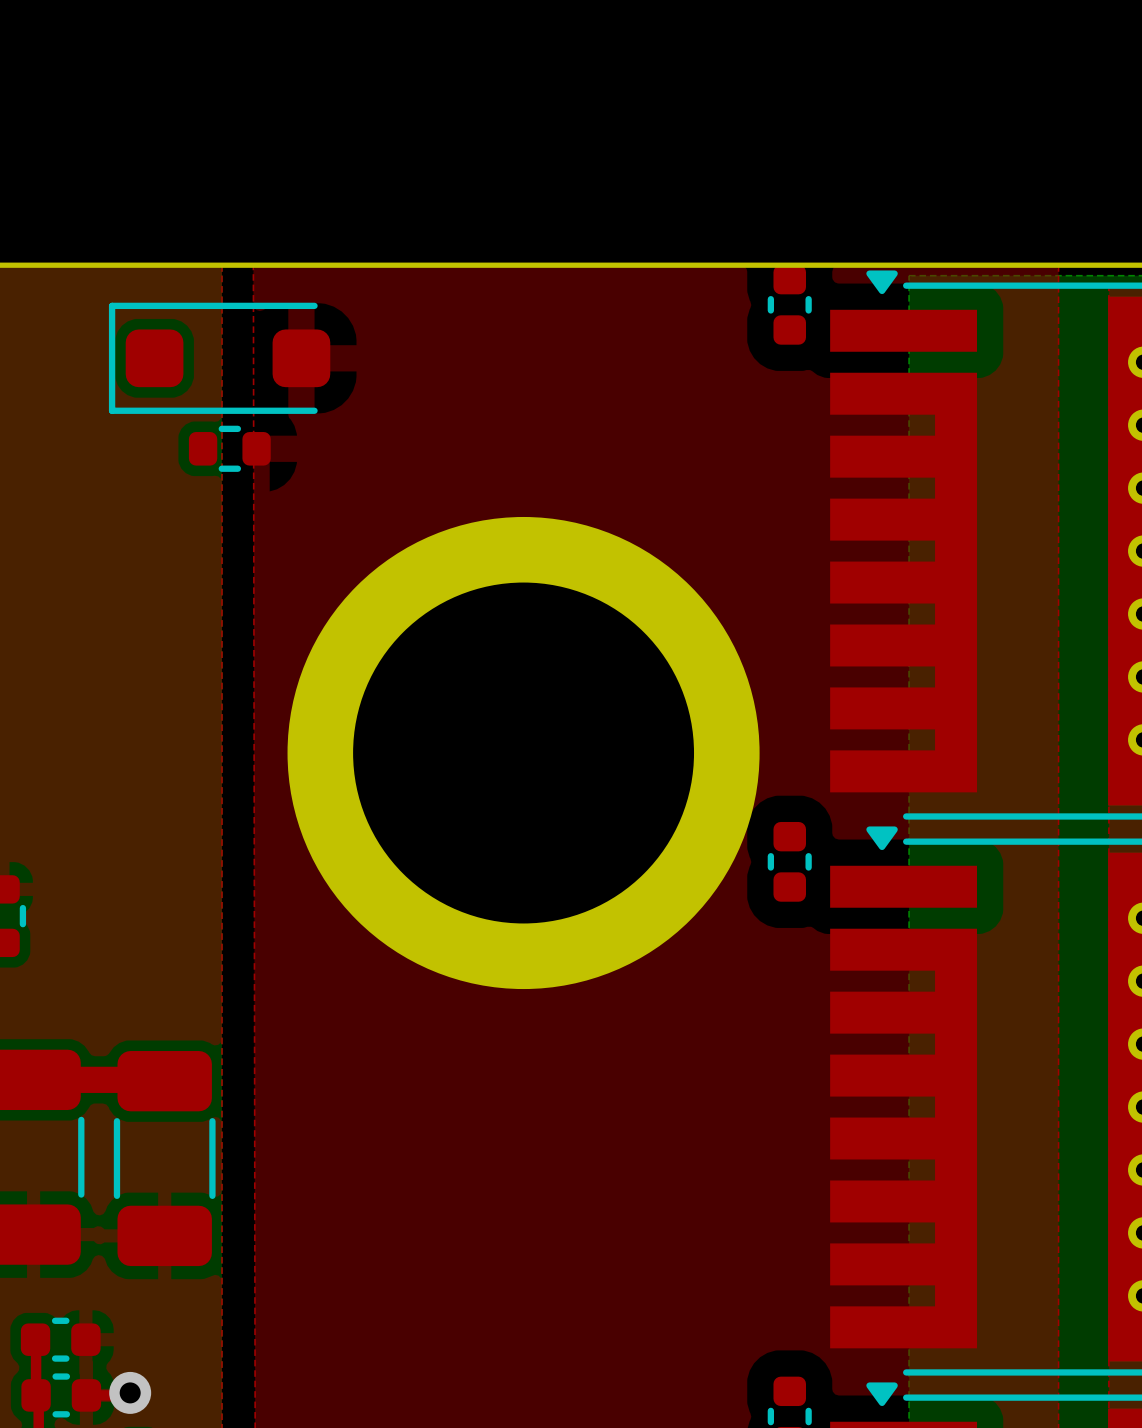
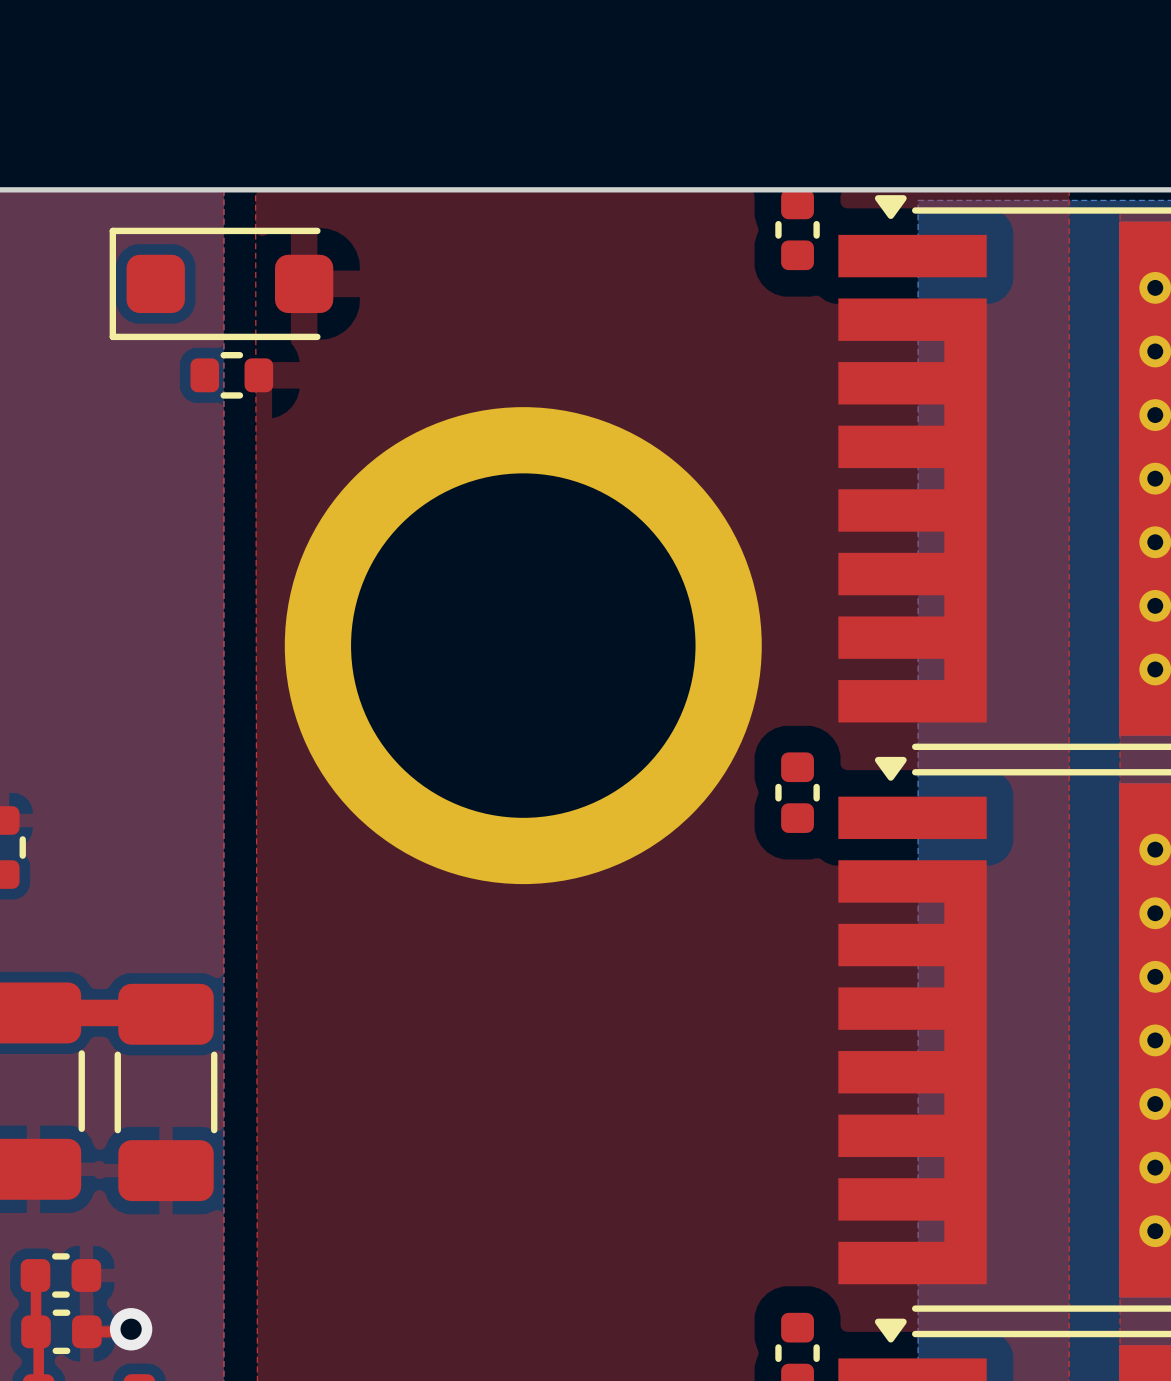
part position: (523, 753) -> (523, 645)

